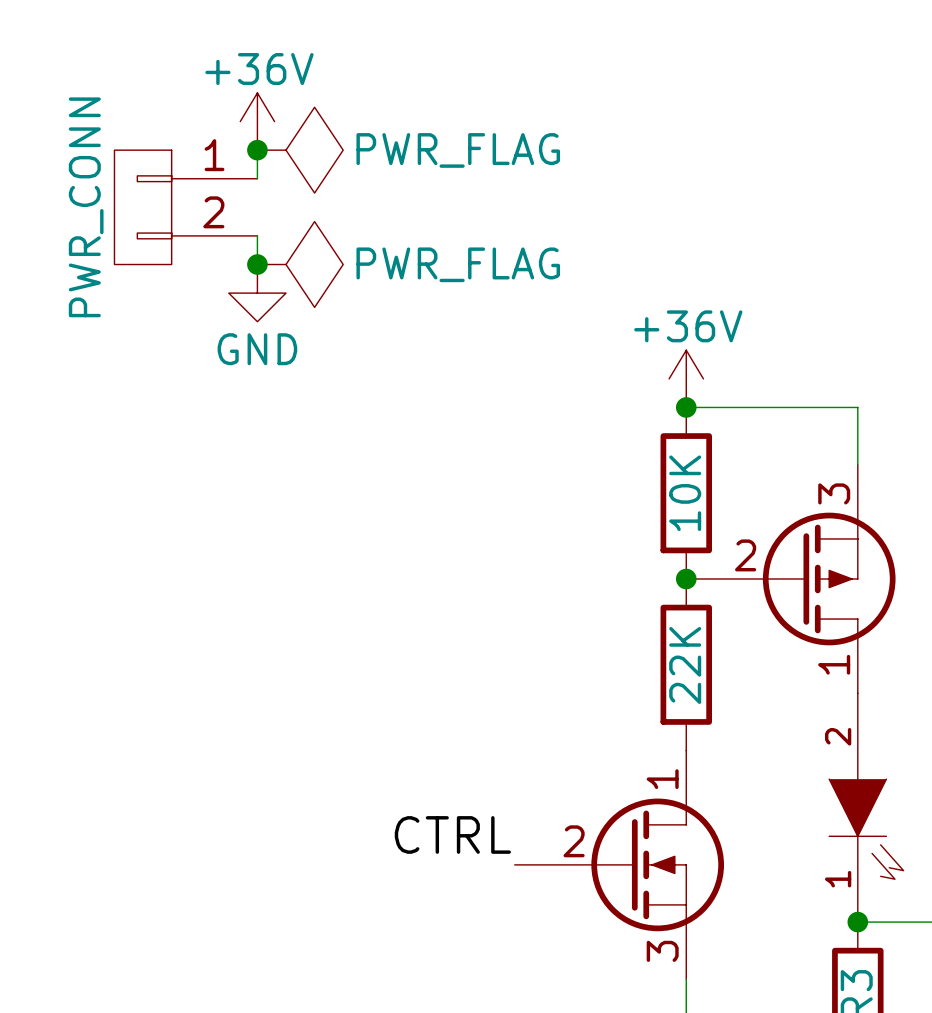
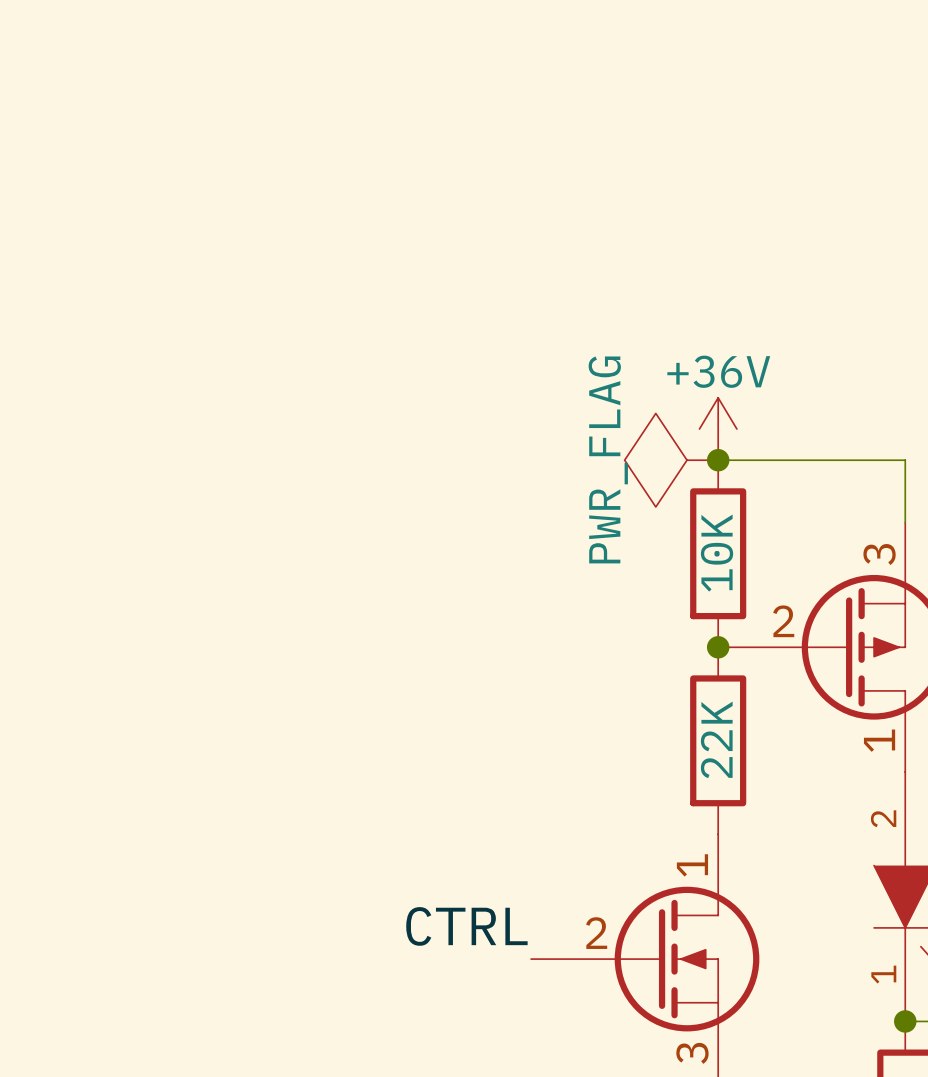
power symbol: +36V (257, 121) -> none
wire: (257, 150) (257, 178) -> none
junction: (257, 150) -> none
power symbol: PWR_FLAG (300, 150) -> none
part: PWR_CONN (185, 207) -> none
wire: (257, 235) (257, 264) -> none
junction: (257, 264) -> none
power symbol: PWR_FLAG (300, 264) -> none
power symbol: GND (257, 293) -> none
power symbol: none -> PWR_FLAG (671, 460)

